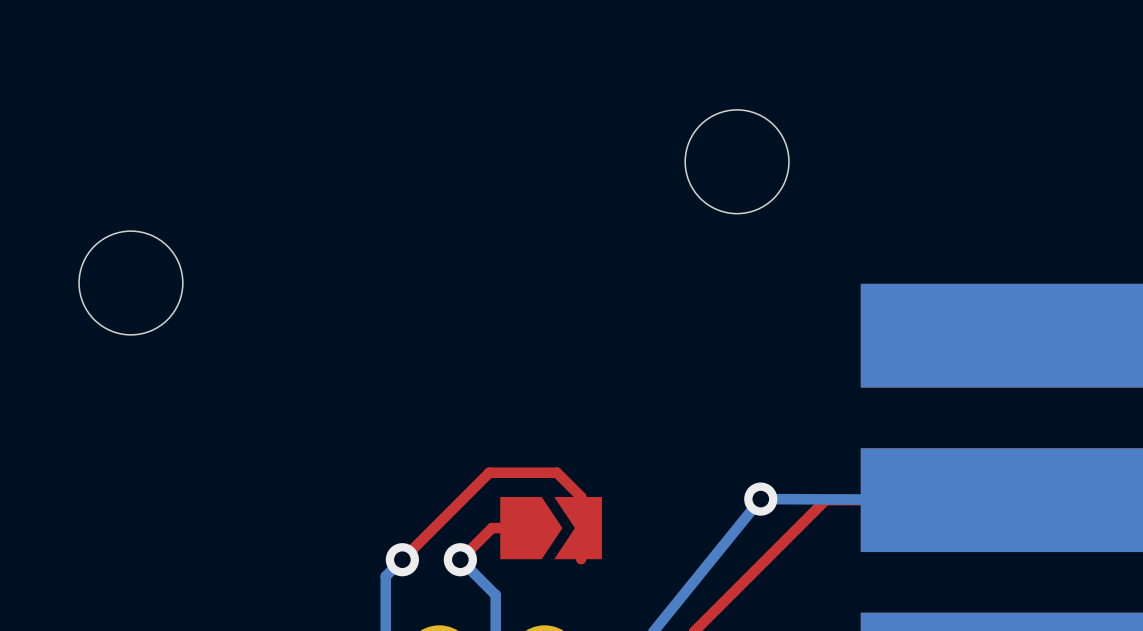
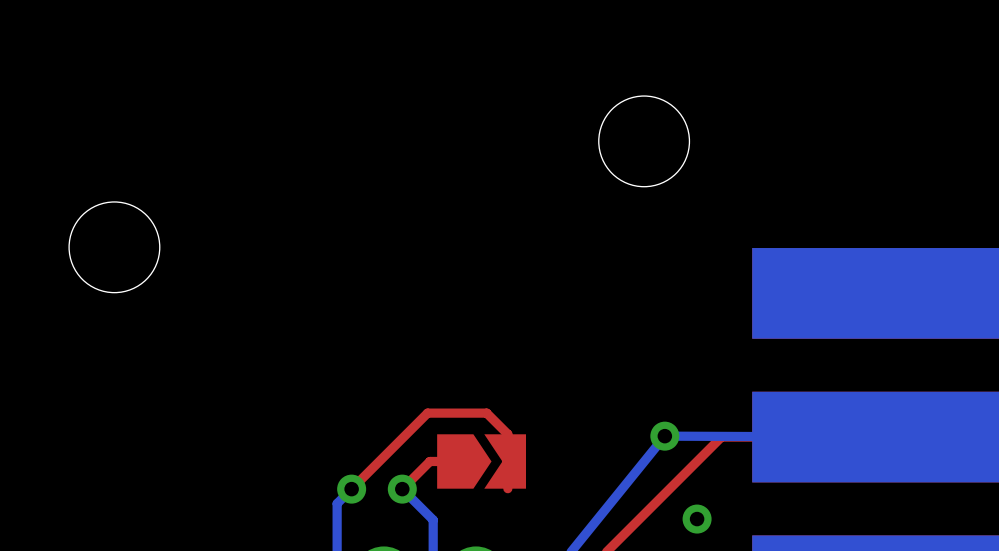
via: none -> (697, 519)

